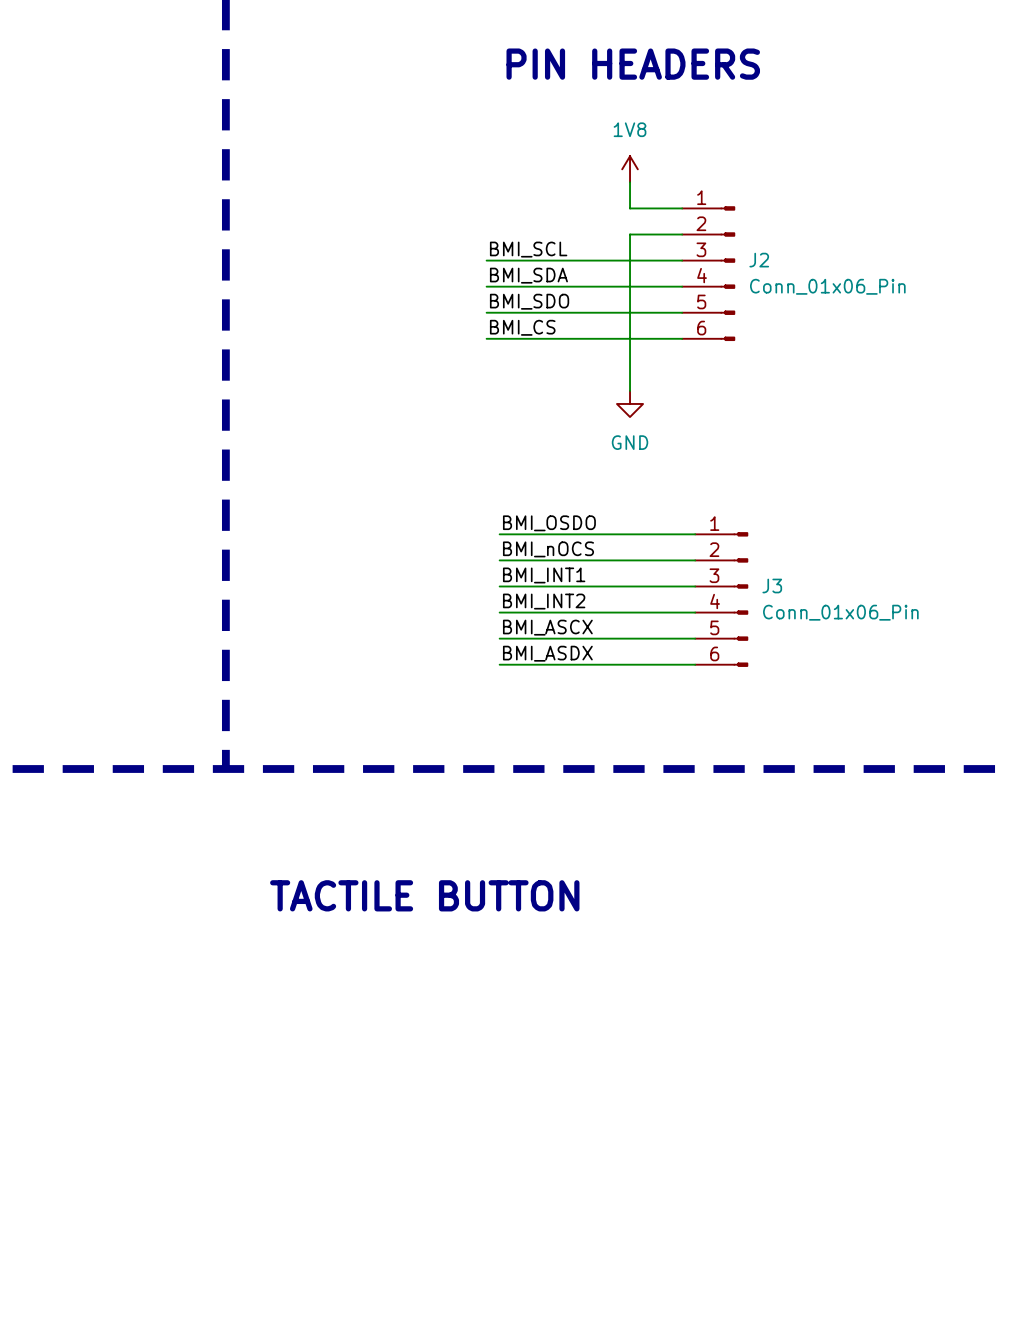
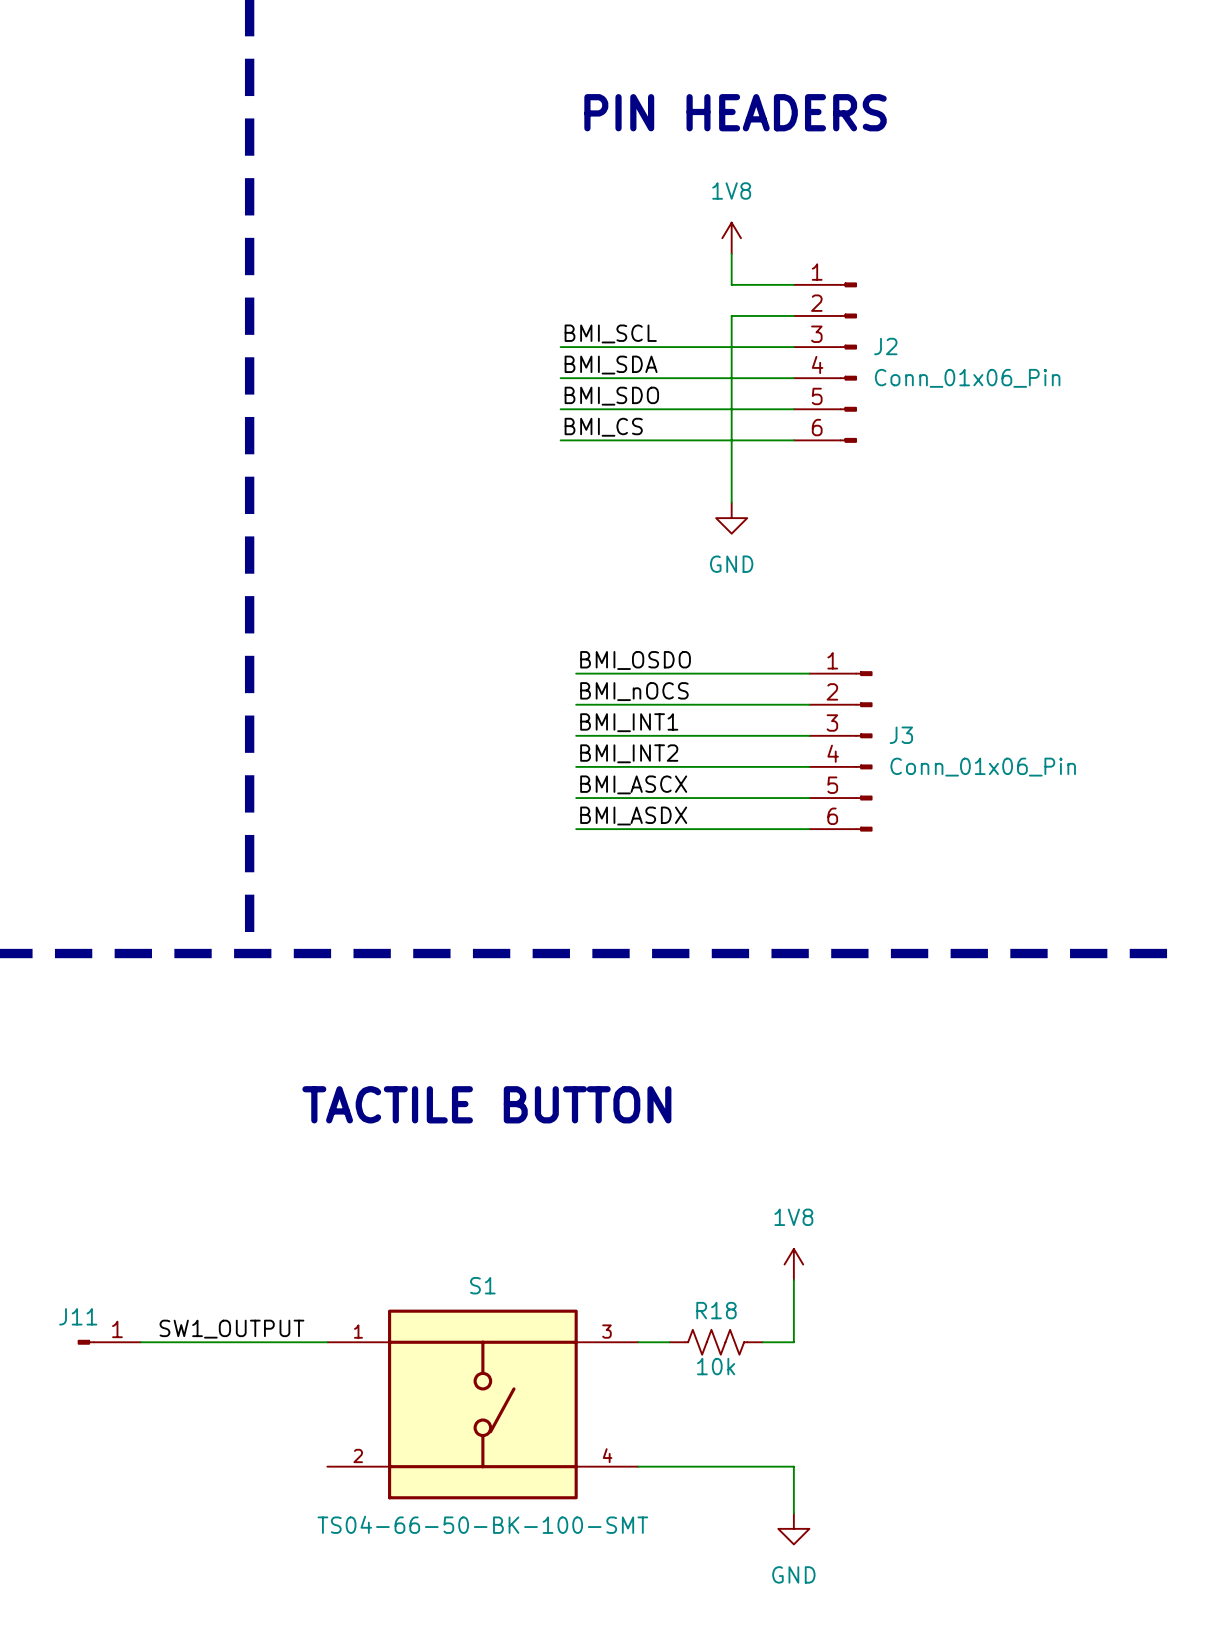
power symbol: none -> 1V8 (793, 1264)
wire: none -> (793, 1280) (793, 1342) (762, 1342)
label: none -> SW1_OUTPUT (231, 1329)
J11: none -> (109, 1342)
wire: none -> (140, 1342) (327, 1342)
wire: none -> (638, 1342) (669, 1342)
R18: none -> 10k (716, 1342)
S1: none -> TS04-66-50-BK-100-SMT (482, 1404)
wire: none -> (638, 1466) (793, 1466) (793, 1513)
power symbol: none -> GND (793, 1528)

